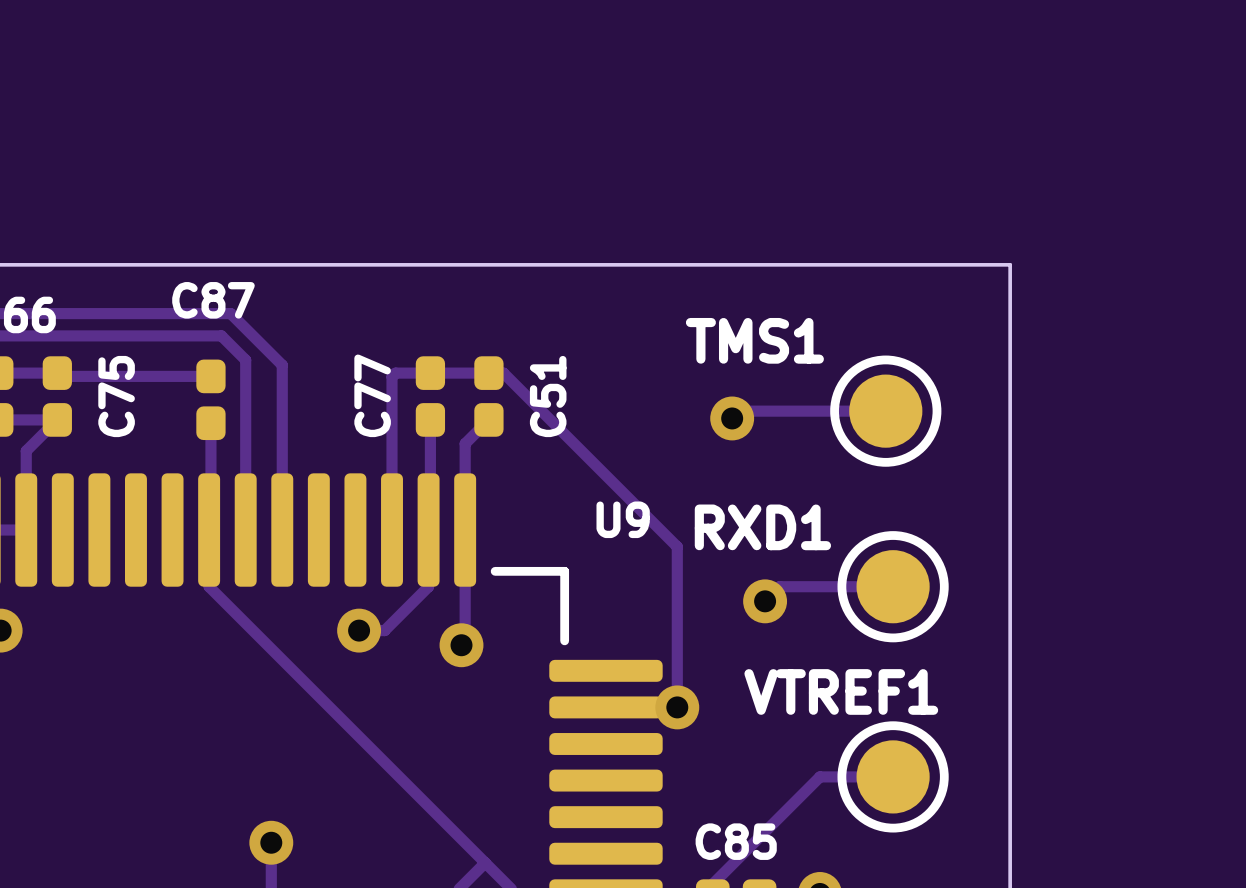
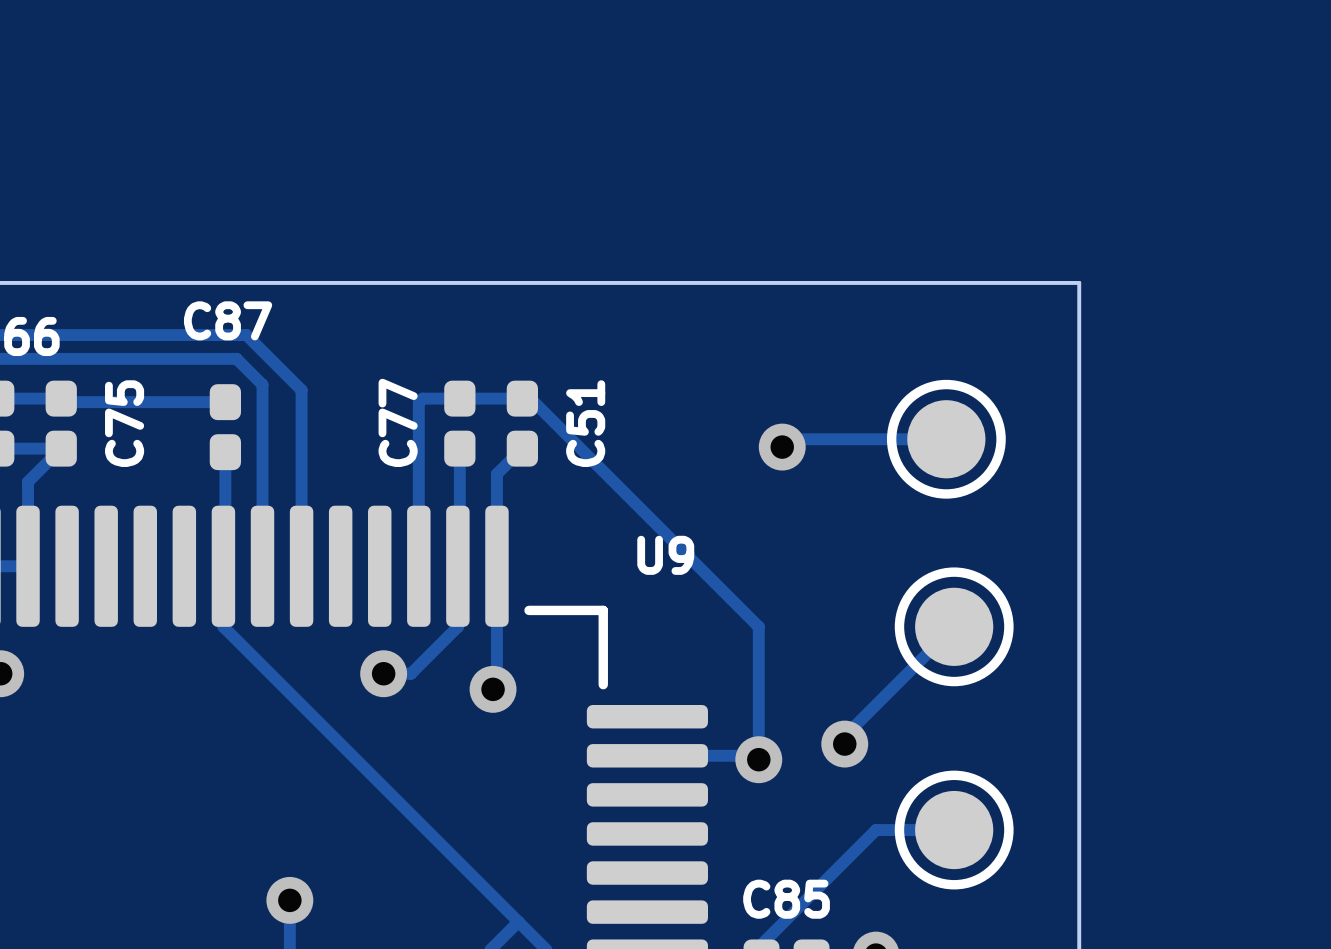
text: TMS1 (754, 340) -> none
track: (496, 373) (503, 373) (677, 546) (677, 707) -> (530, 398) (758, 626) (758, 759) (754, 755) (723, 755)
text: RXD1 (762, 527) -> none
track: (893, 586) (779, 586) (765, 601) -> (954, 626) (844, 736) (844, 744) (860, 744)
via: (765, 601) -> none
text: VTREF1 (841, 691) -> none
via: none -> (844, 744)
via position: (677, 707) -> (758, 759)

